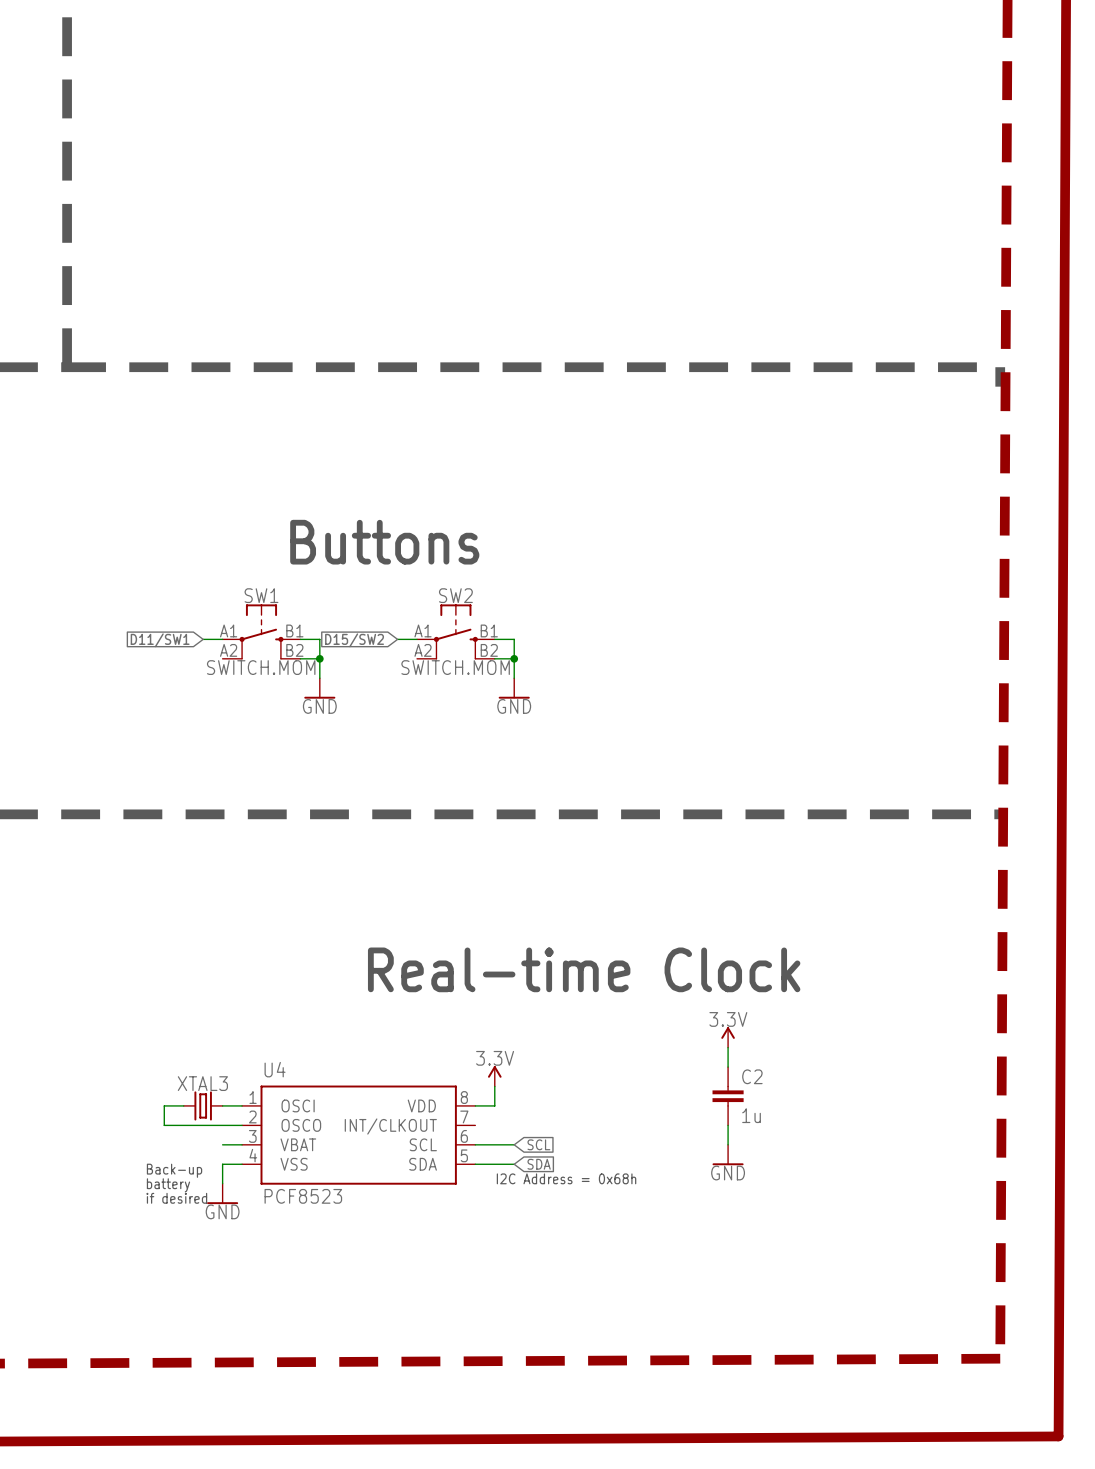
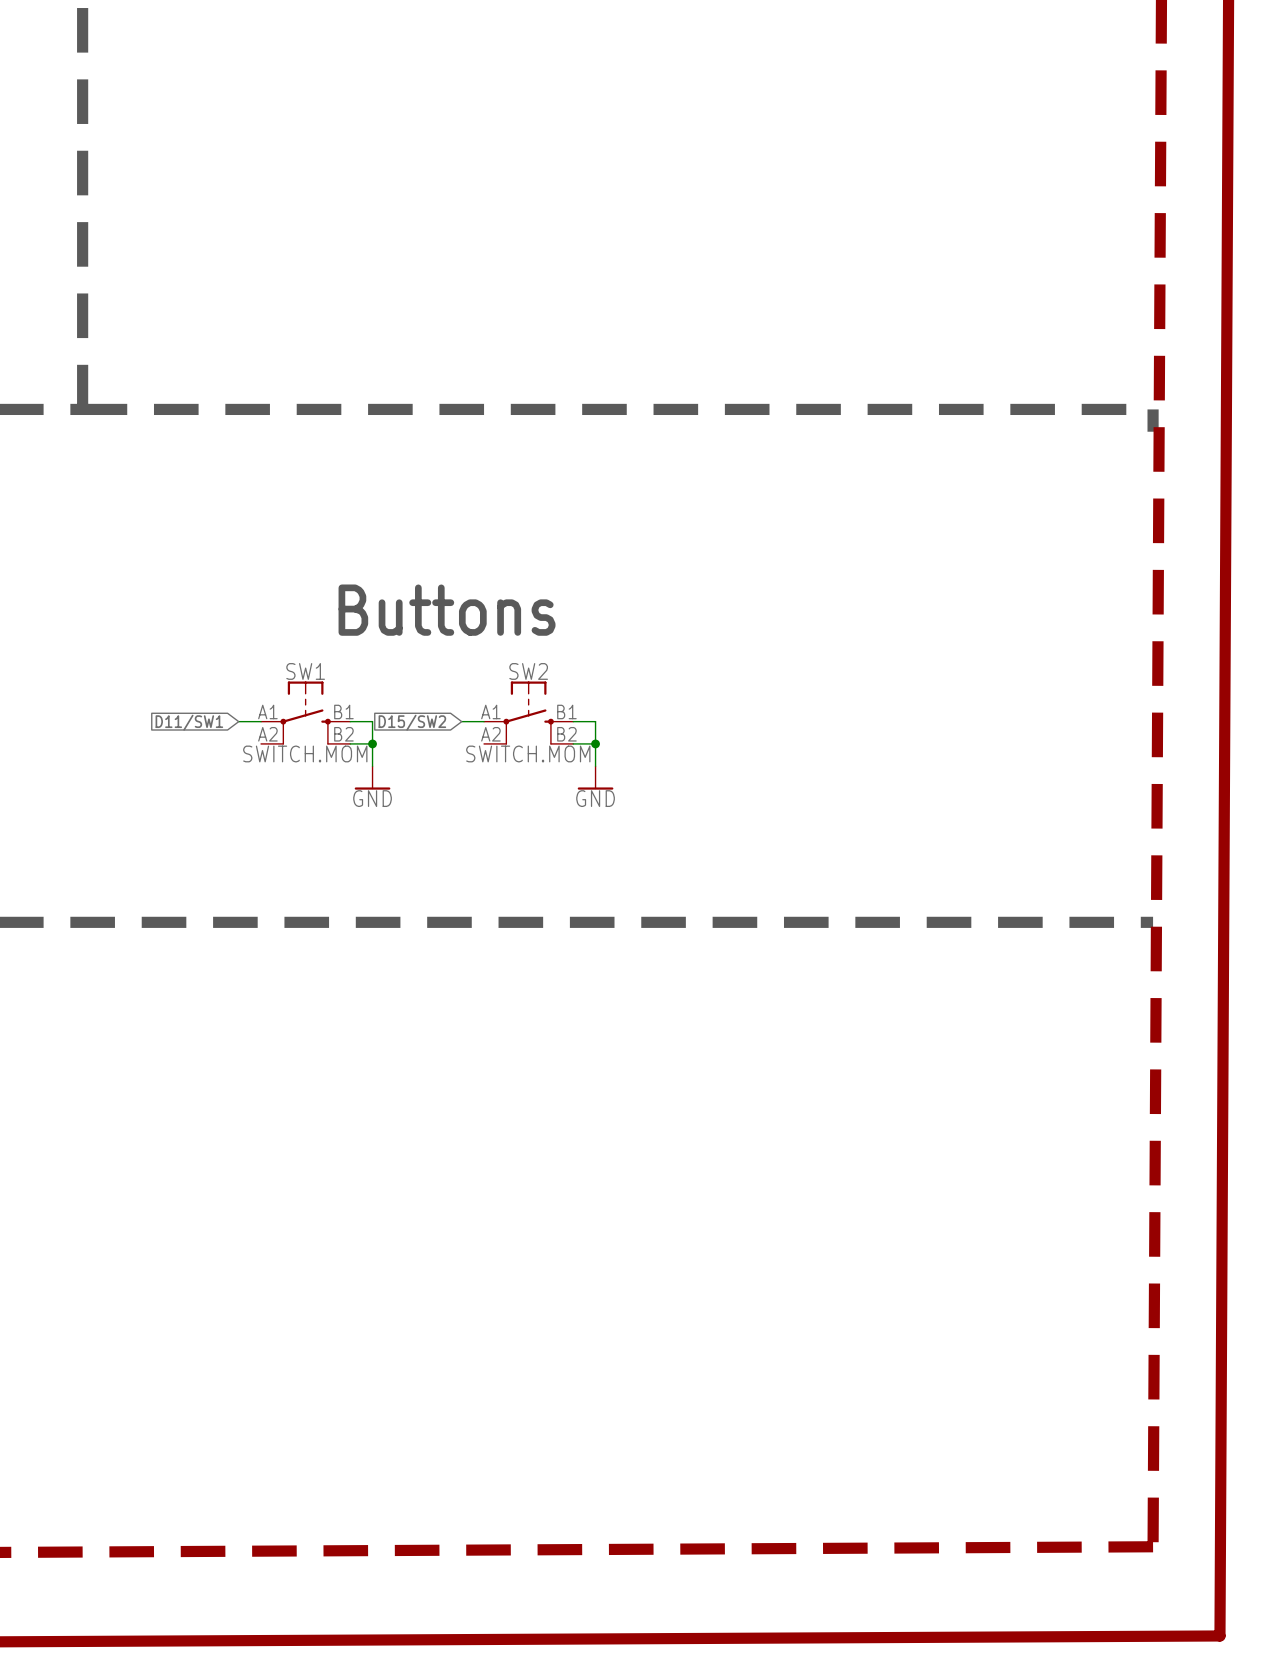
text: Real-time Clock (584, 969) -> none
power symbol: 3.3V (728, 1037) -> none
wire: (728, 1047) (728, 1067) -> none
power symbol: 3.3V (494, 1076) -> none
wire: (494, 1086) (494, 1105) (475, 1105) -> none
C2: 1u (728, 1096) -> none
wire: (183, 1105) (164, 1105) (164, 1125) (242, 1125) -> none
XTAL3: (203, 1105) -> none
wire: (222, 1105) (242, 1105) -> none
wire: (728, 1125) (728, 1144) -> none
U4: PCF8523 (358, 1135) -> none
wire: (222, 1144) (242, 1144) -> none
wire: (475, 1144) (514, 1144) -> none
global label: SCL (538, 1144) -> none
power symbol: GND (728, 1155) -> none
wire: (242, 1164) (222, 1164) (222, 1183) -> none
wire: (475, 1164) (514, 1164) -> none
global label: SDA (539, 1164) -> none
text: Back-up (174, 1170) -> none
text: I2C Address = 0x68h (566, 1178) -> none
text: battery (168, 1185) -> none
power symbol: GND (222, 1193) -> none
text: if desired (176, 1198) -> none

